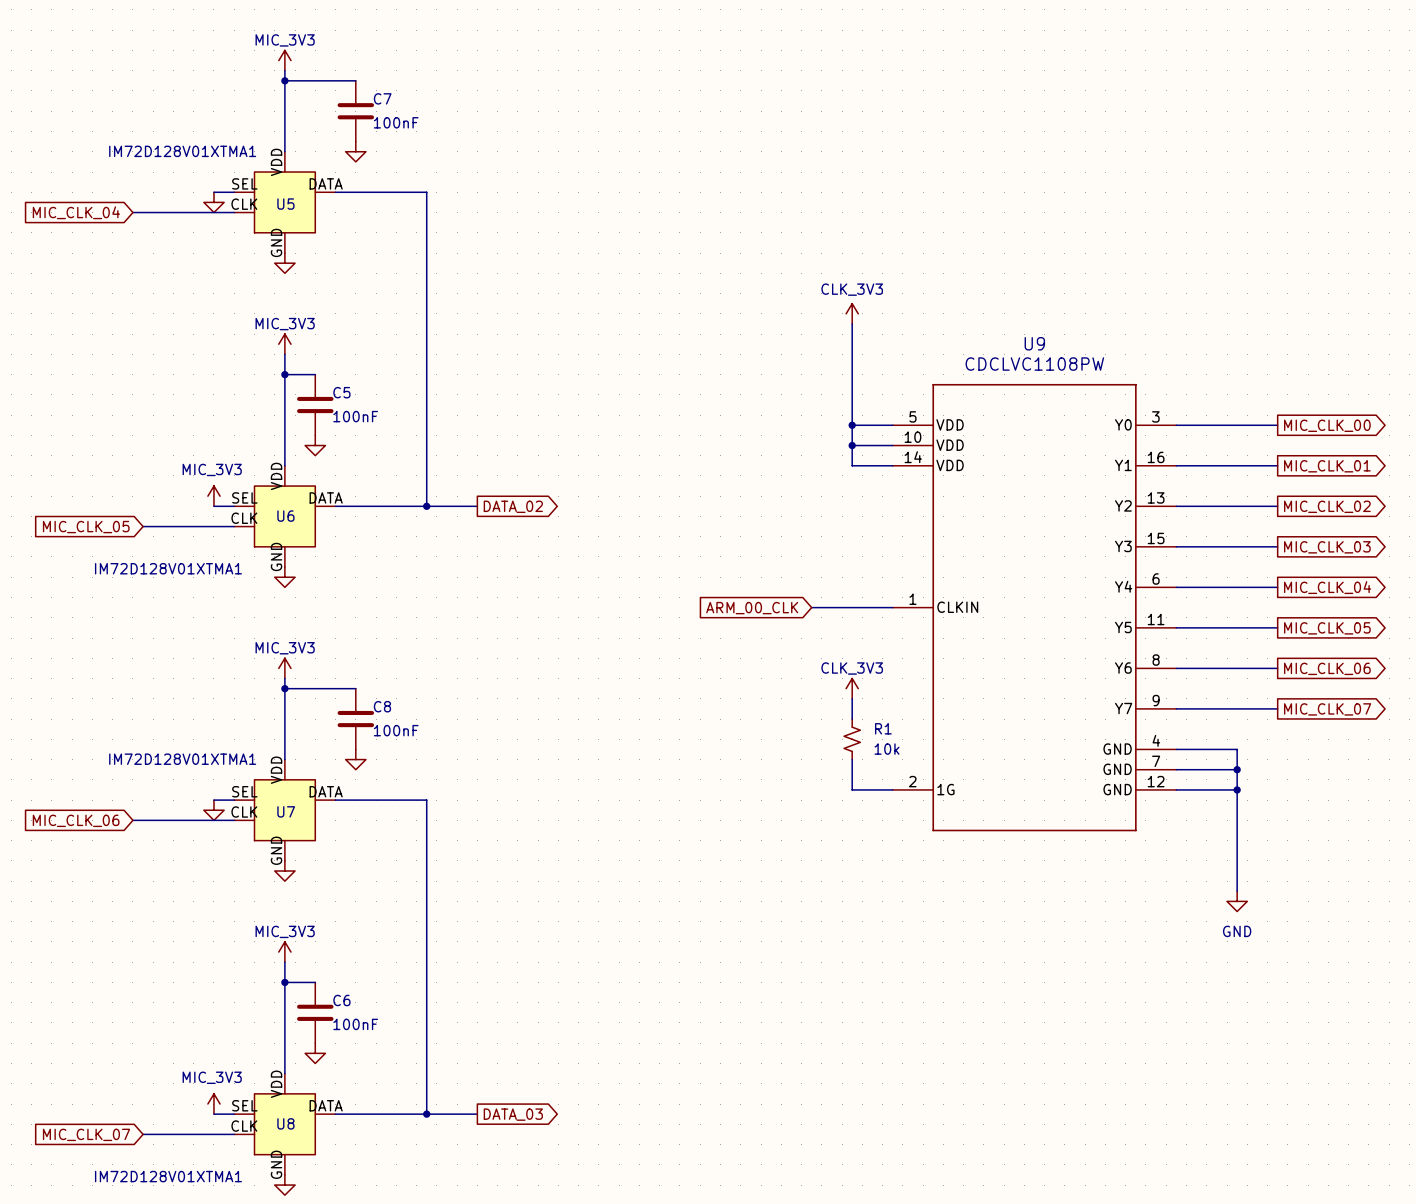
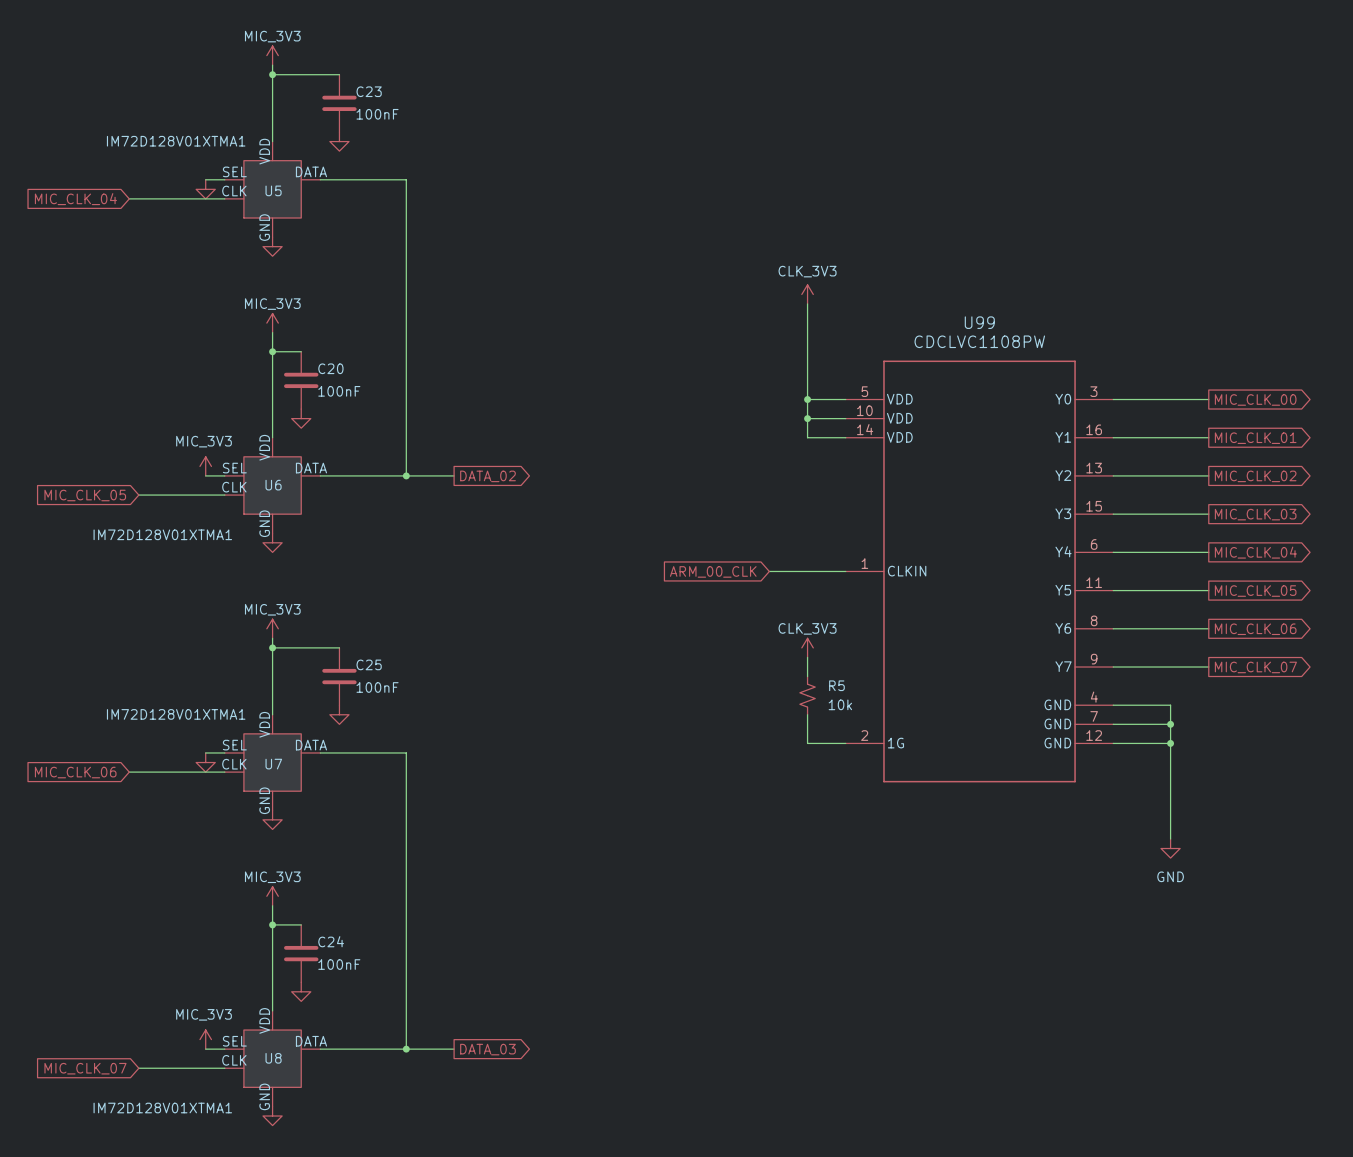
C7 name: C7 (382, 98) -> C23 (369, 91)
U9 name: U9 (1034, 343) -> U99 (979, 322)
C5 name: C5 (341, 392) -> C20 (330, 368)
C8 name: C8 (382, 706) -> C25 (369, 664)
R1 name: R1 (883, 728) -> R5 (836, 685)
C6 name: C6 (341, 1000) -> C24 (331, 941)

